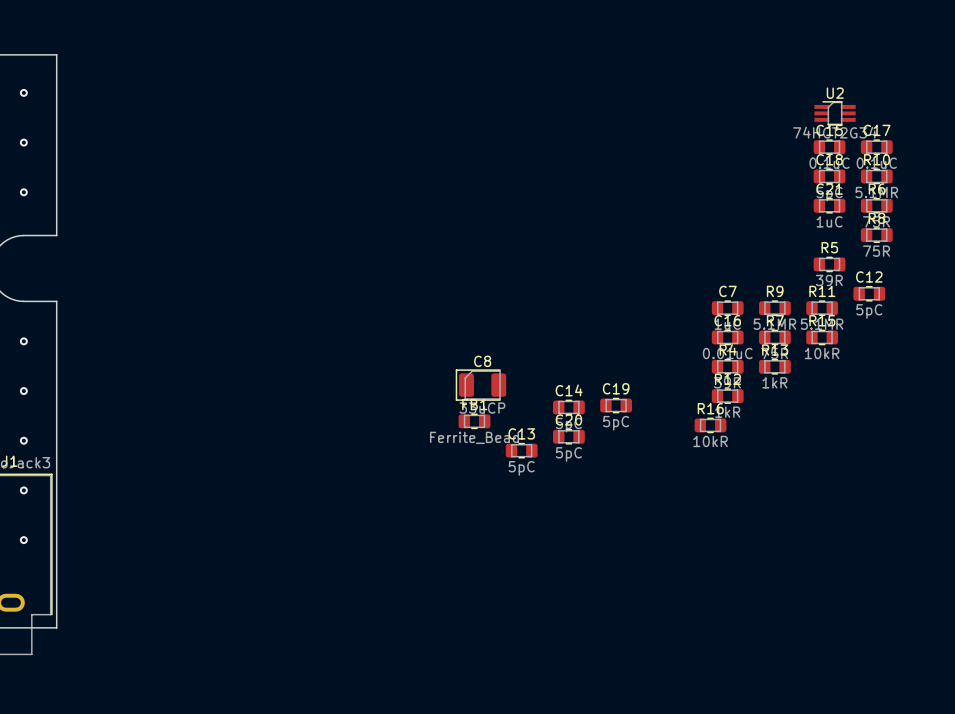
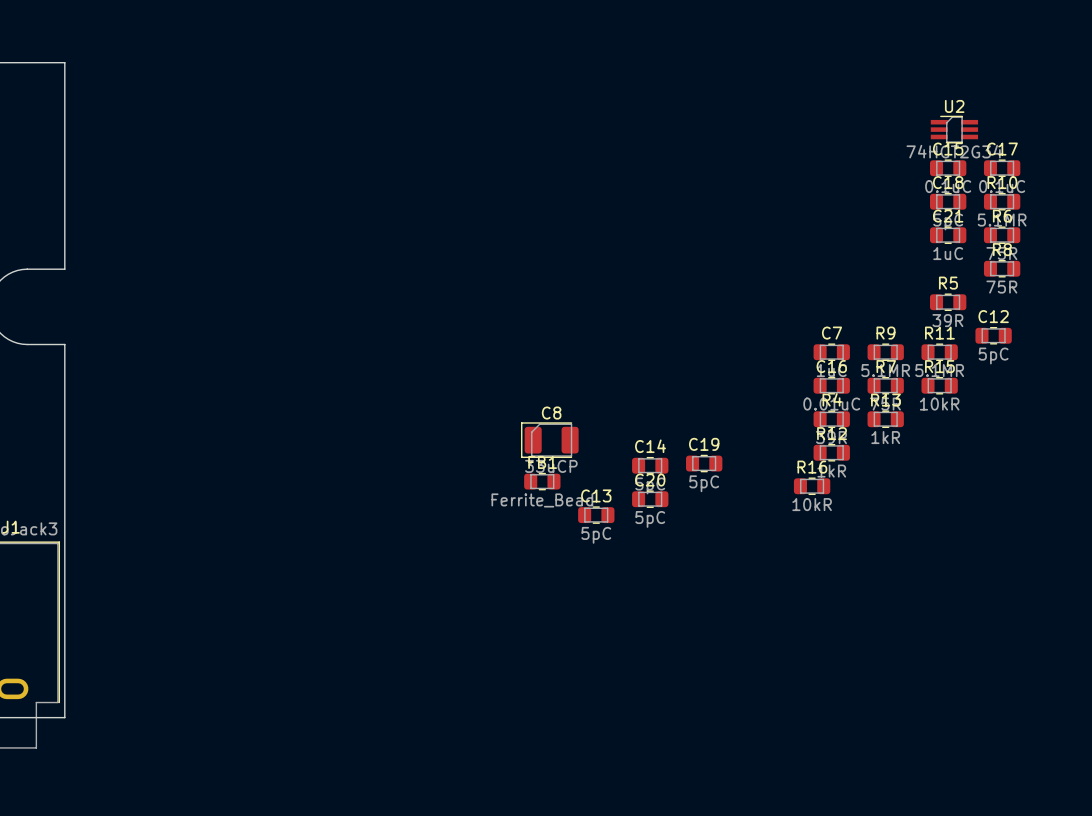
via: (23, 92) -> none
via: (23, 142) -> none
via: (23, 192) -> none
via: (23, 341) -> none
via: (23, 391) -> none
via: (23, 440) -> none
via: (23, 490) -> none
via: (23, 540) -> none

